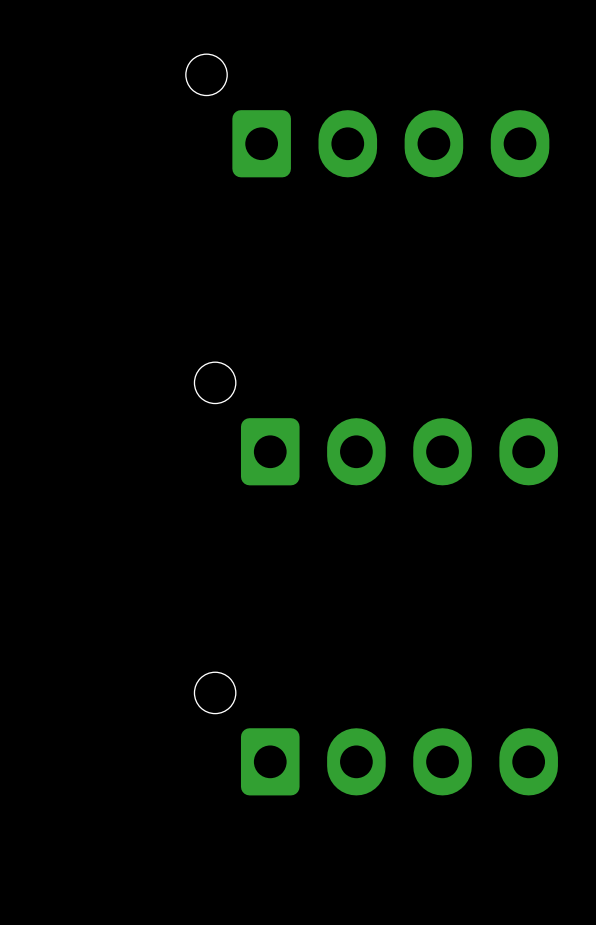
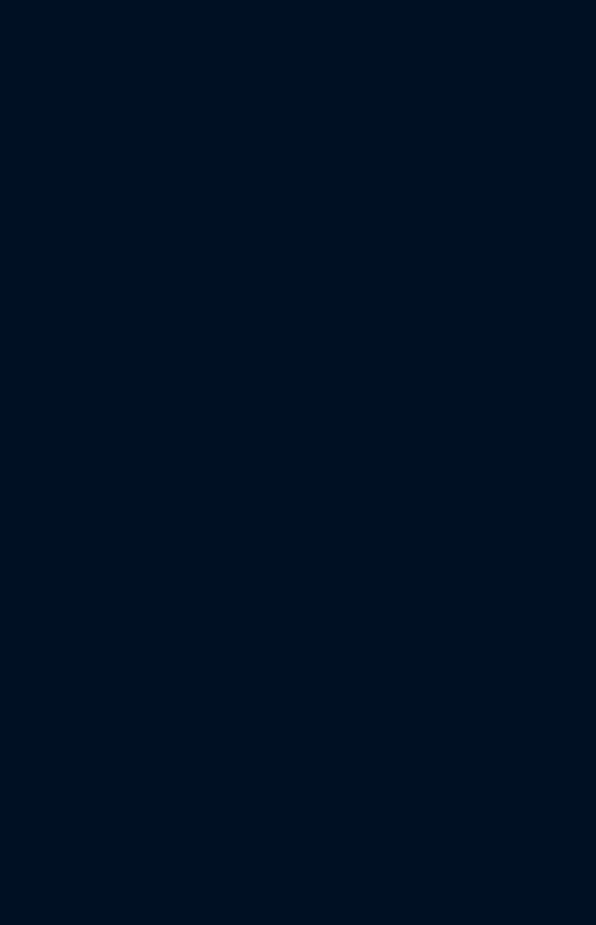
part: (367, 115) -> none
part: (376, 423) -> none
part: (376, 733) -> none

